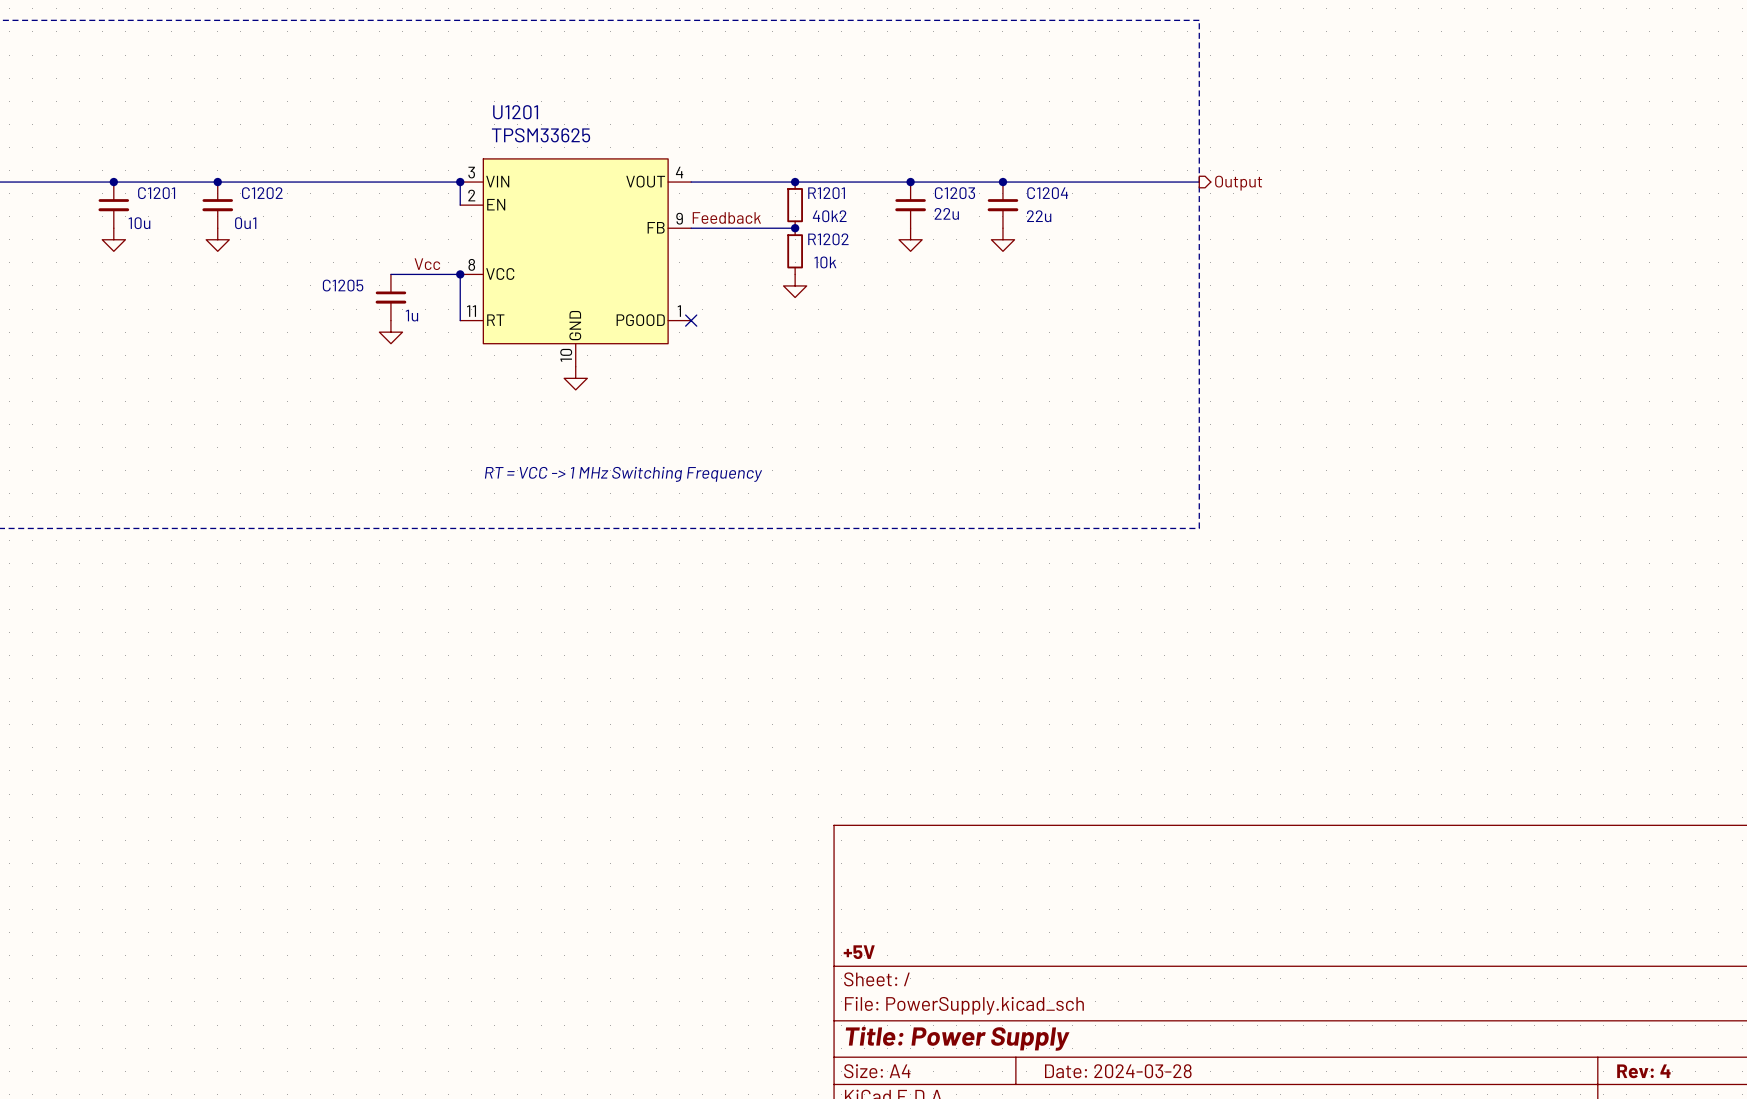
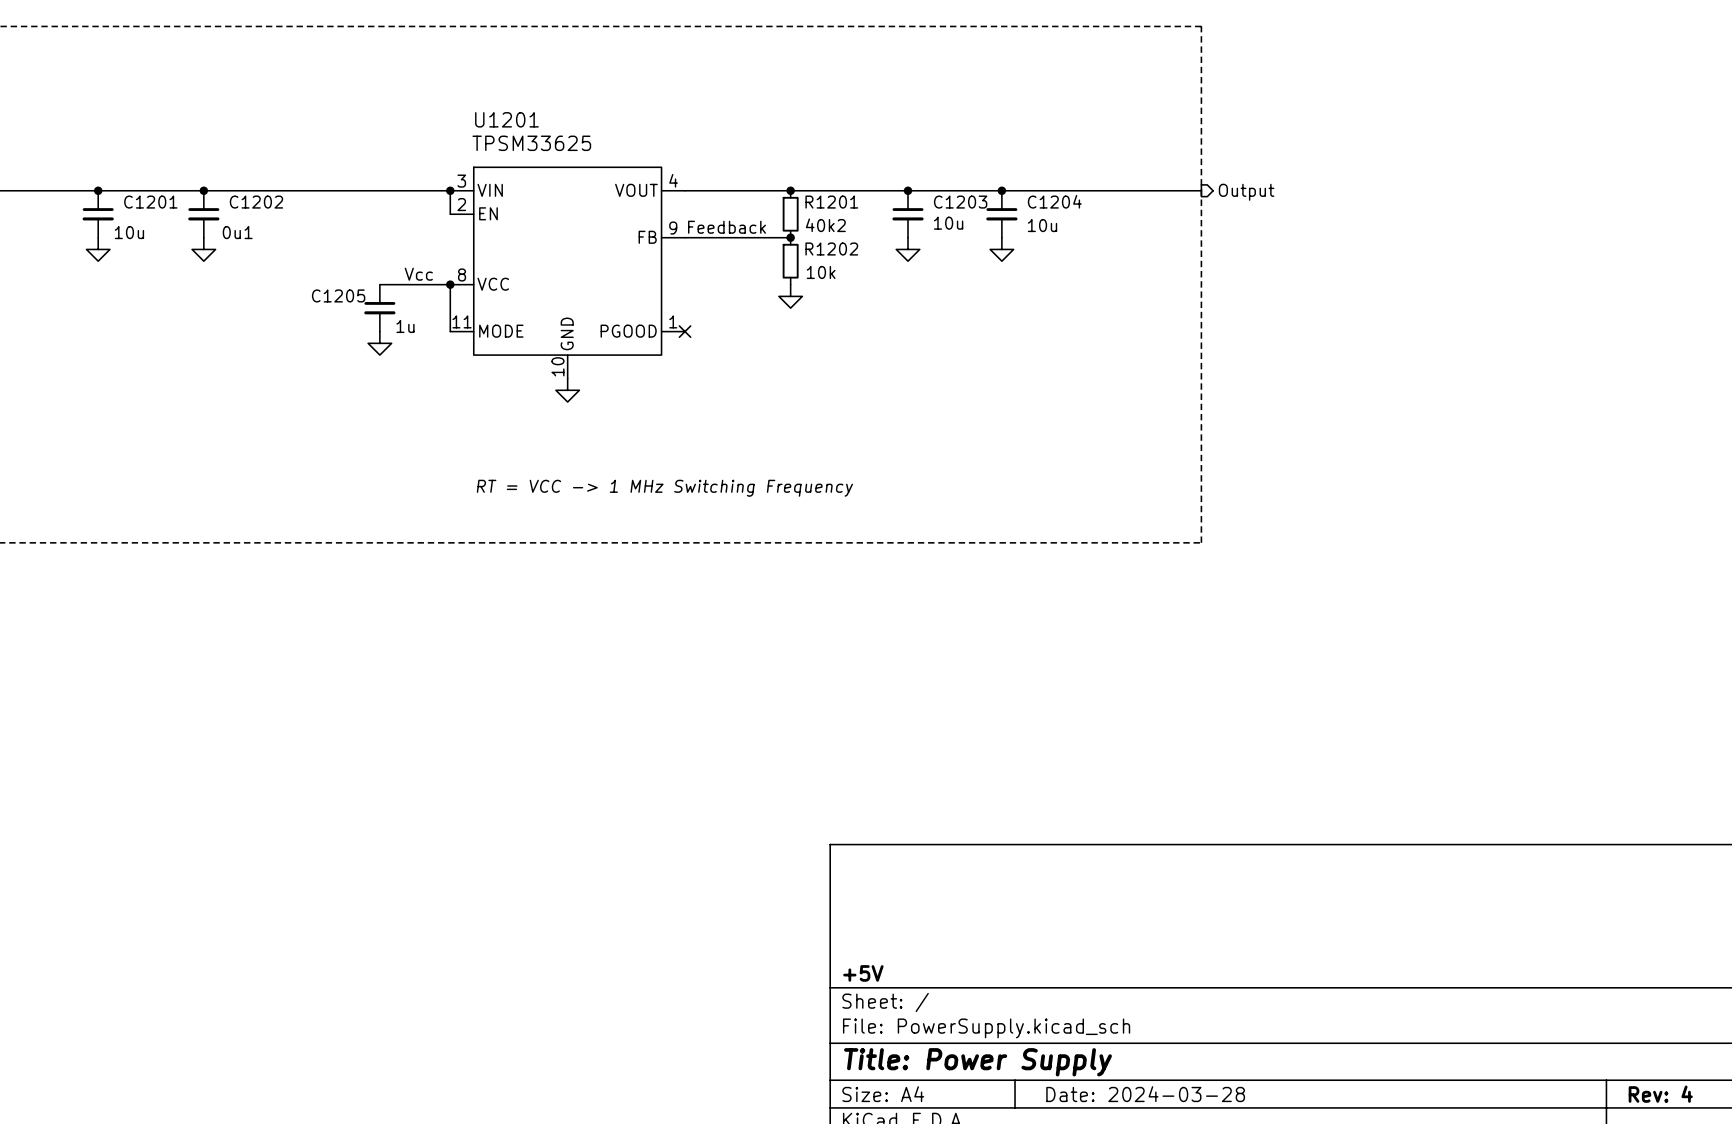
C1203 value: 22u (946, 213) -> 10u (948, 223)
C1204 value: 22u (1039, 216) -> 10u (1042, 225)
U1201 pin name: RT (495, 320) -> MODE (501, 331)

